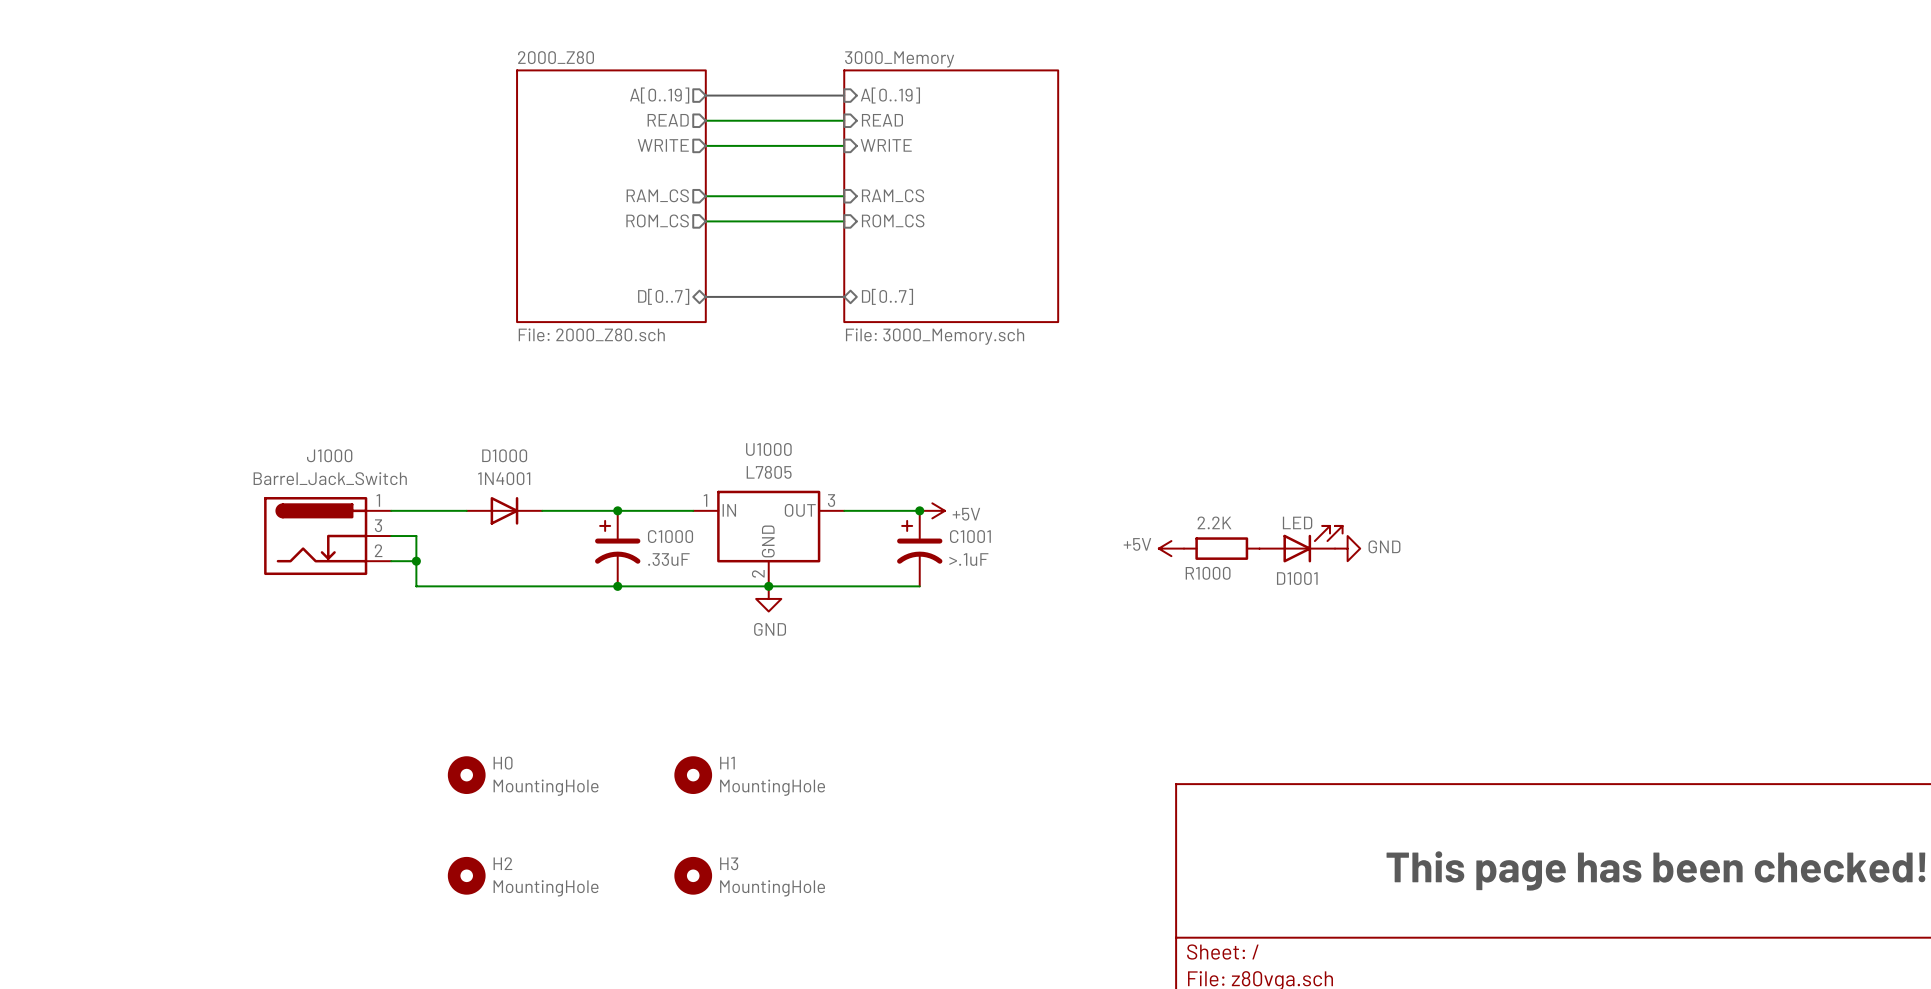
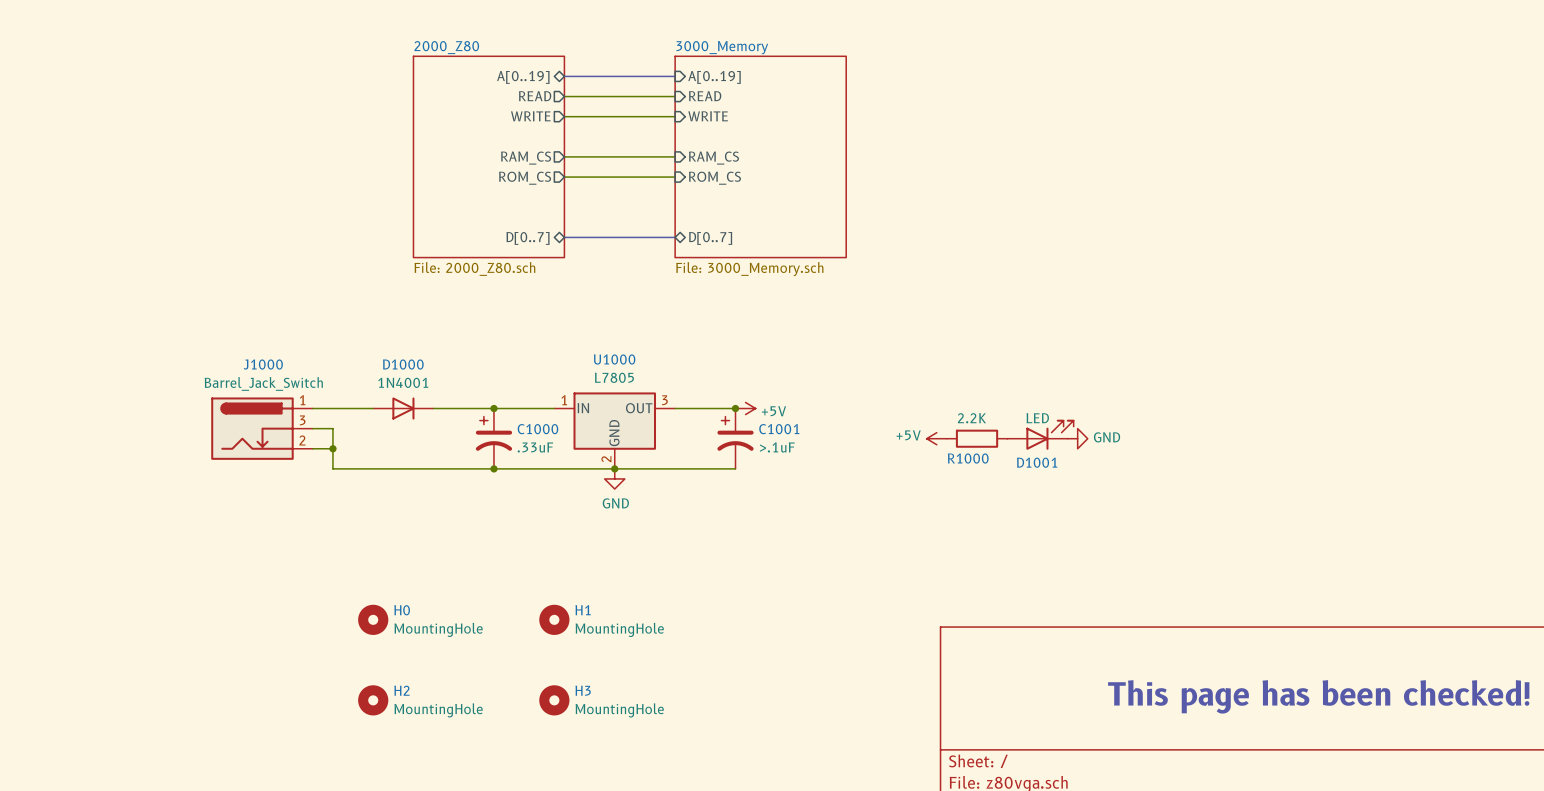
sheet pin shape: output (659, 95) -> bidirectional (523, 77)

